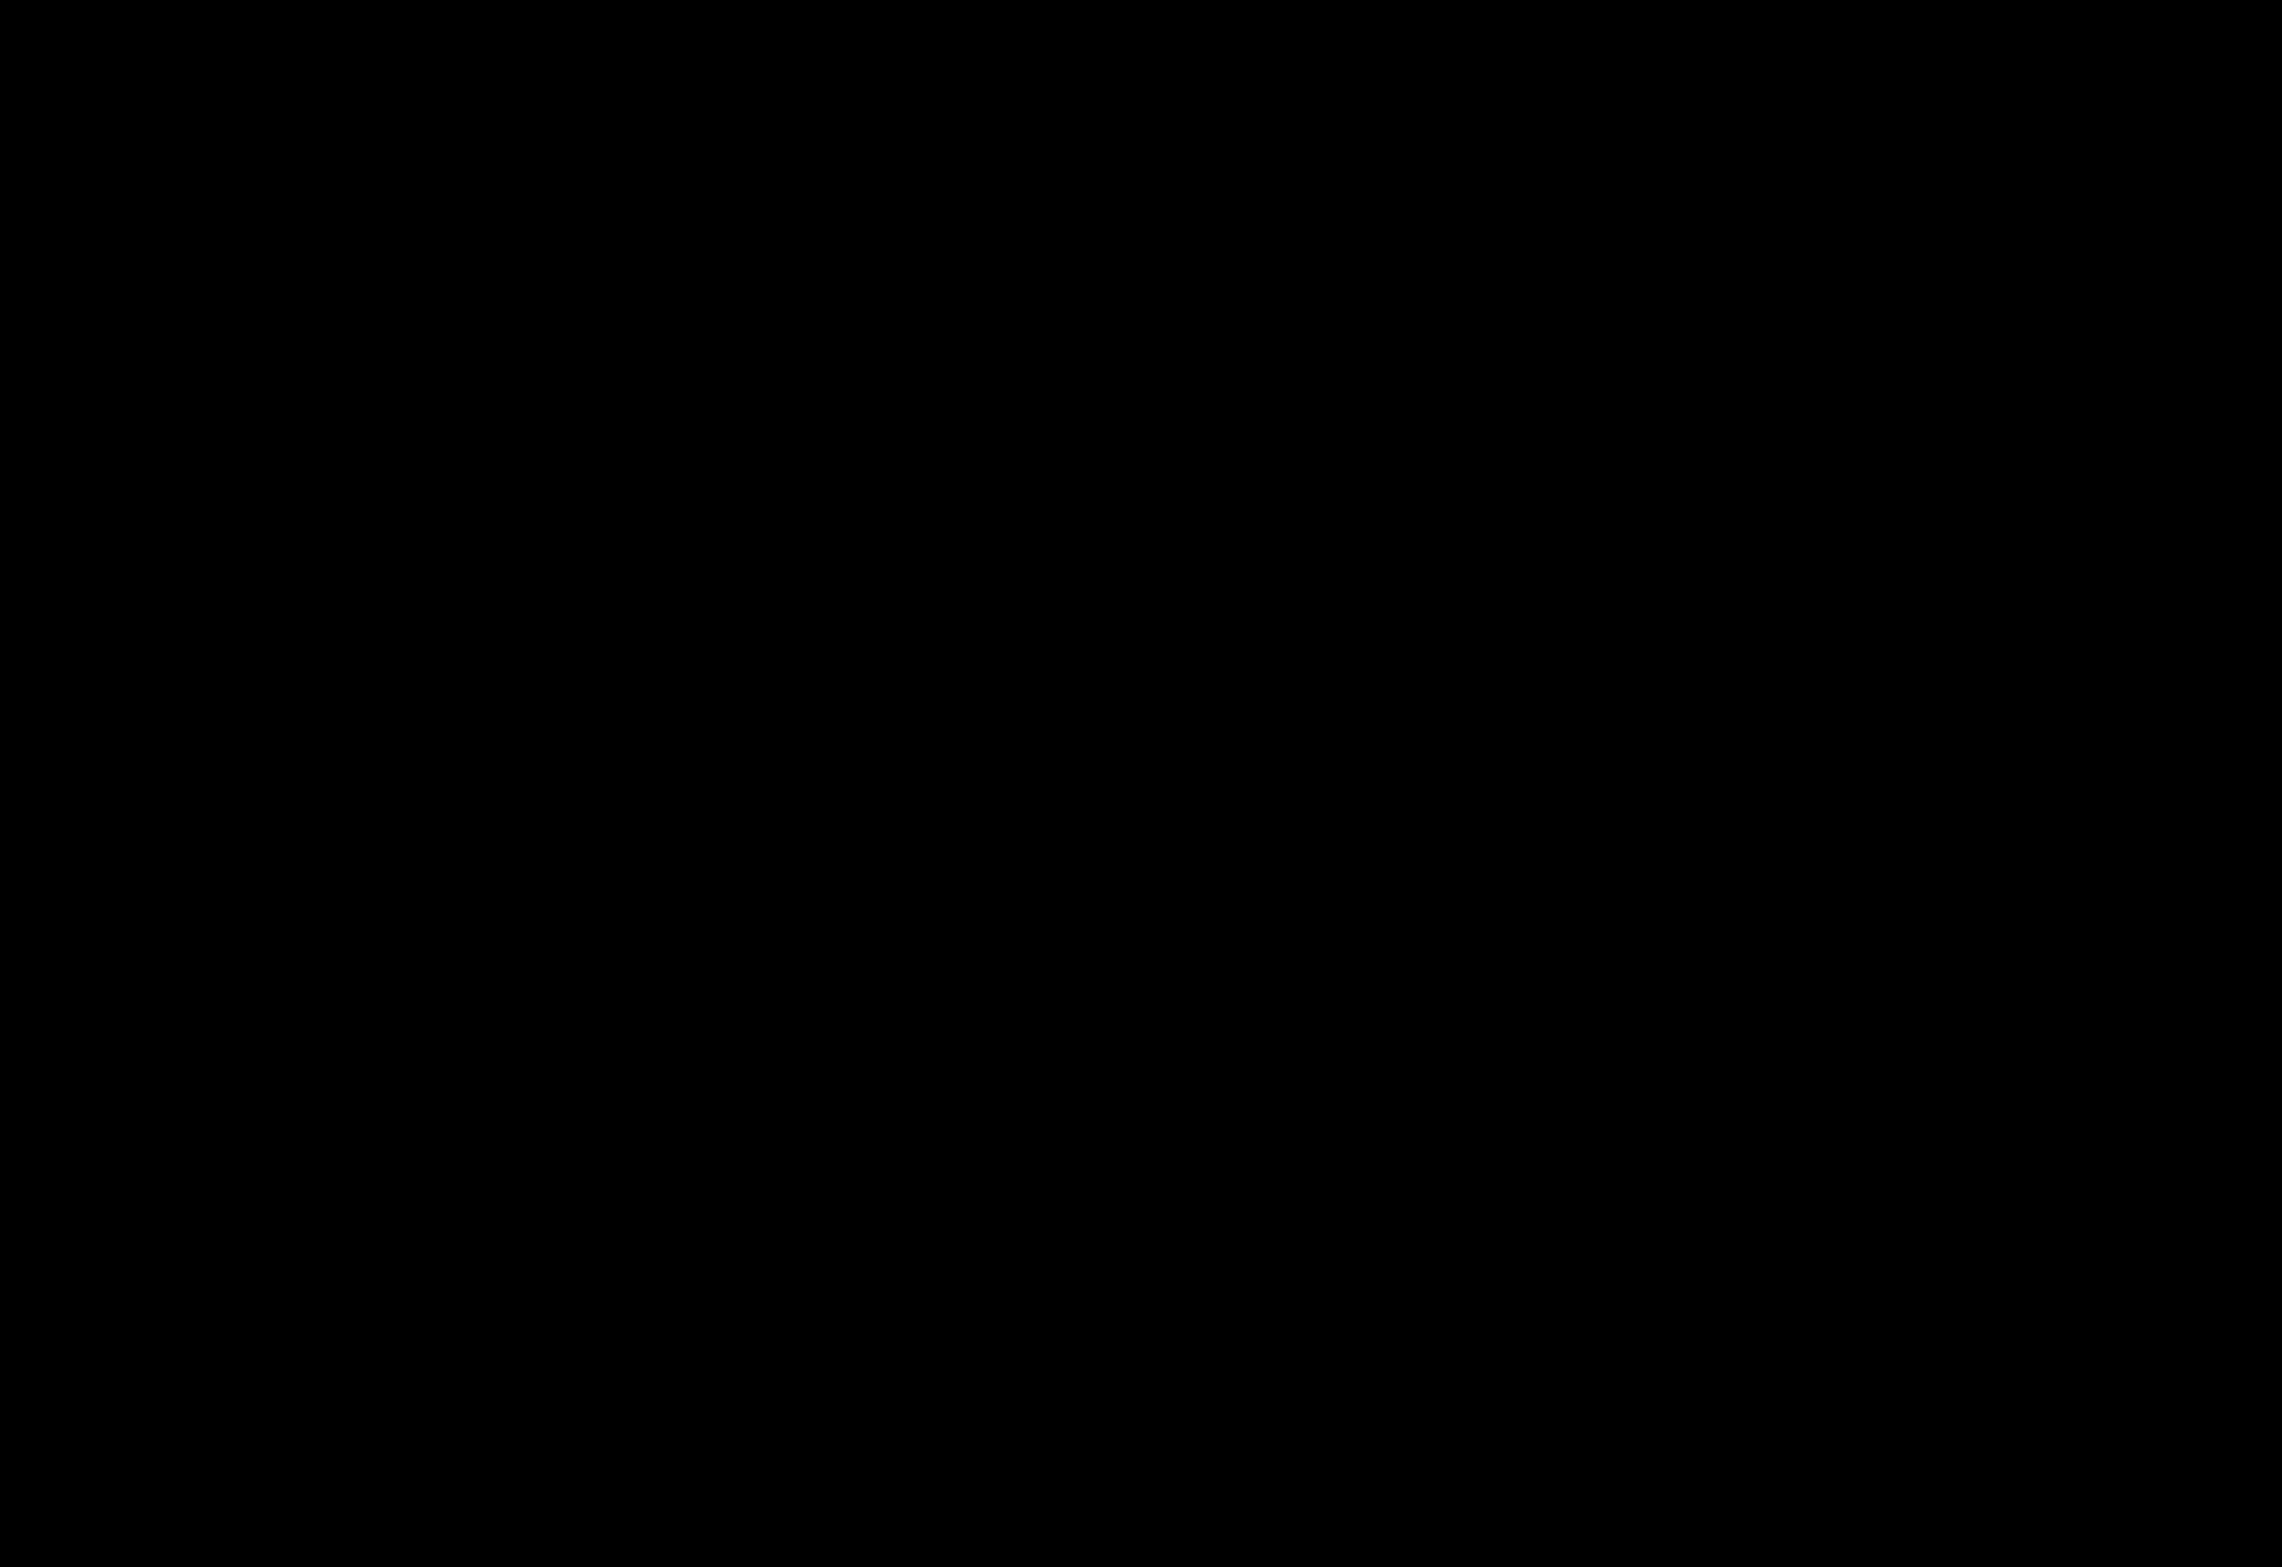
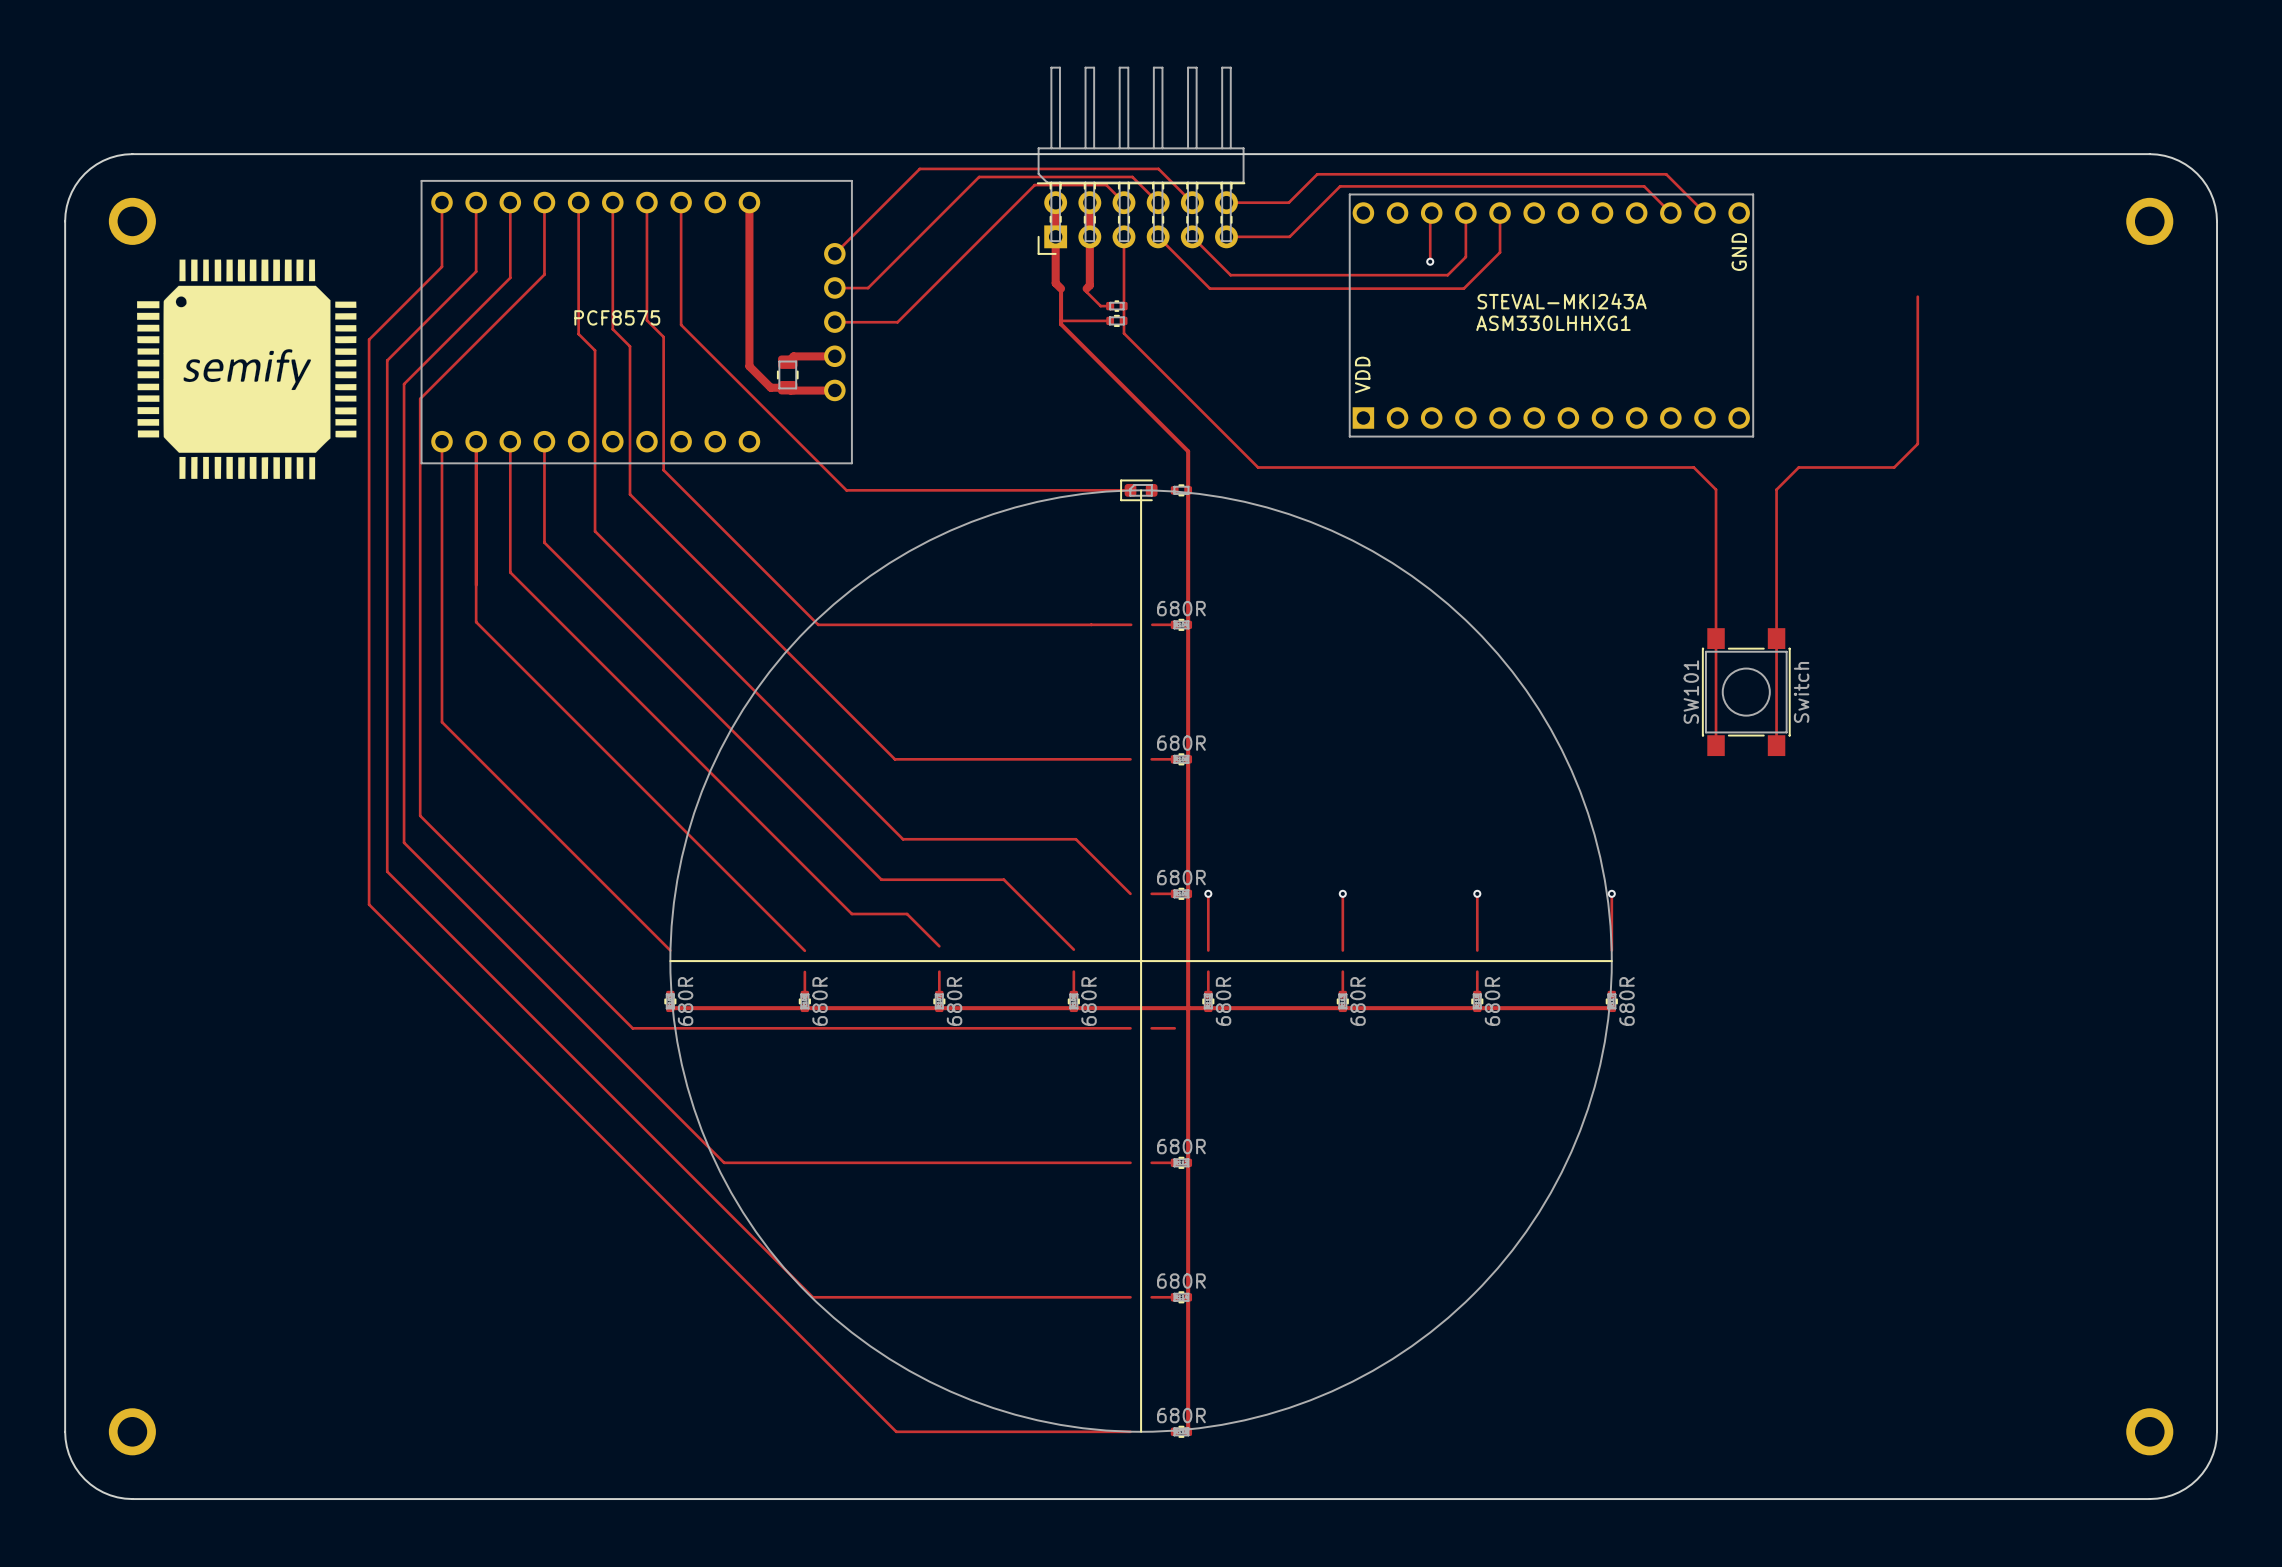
board edge: none -> (132, 154) (2149, 154) (2164, 155) (2185, 164) (2197, 173) (2210, 192) (2215, 206) (2217, 221) (2217, 1431) (2213, 1454) (2206, 1467) (2197, 1479) (2178, 1492) (2164, 1497) (2149, 1499) (132, 1499) (117, 1497) (96, 1488) (84, 1479) (75, 1467) (68, 1454) (65, 1431) (65, 221) (68, 199) (75, 185) (84, 173) (96, 164) (110, 157) (132, 154)
part: none -> (1141, 160)
track: none -> (441, 202) (441, 266) (369, 339) (369, 904) (896, 1431) (1130, 1431)
track: none -> (476, 202) (476, 271) (387, 360) (387, 871) (812, 1297) (1130, 1297)
track: none -> (510, 202) (510, 277) (404, 384) (404, 842) (724, 1162) (1130, 1162)
track: none -> (544, 202) (544, 274) (420, 398) (420, 815) (632, 1028) (1130, 1028)
track: none -> (578, 202) (578, 334) (595, 350) (595, 531) (903, 839) (1075, 839) (1130, 893)
track: none -> (612, 202) (612, 329) (630, 346) (630, 494) (894, 759) (1130, 759)
track: none -> (646, 202) (646, 320) (663, 337) (663, 470) (818, 624) (1131, 624)
track: none -> (681, 202) (681, 324) (846, 490) (1130, 490)
track: none -> (749, 202) (749, 366) (770, 387) (787, 387) (790, 390) (834, 390)
track: none -> (1055, 202) (1055, 283) (1061, 288) (1061, 324) (1188, 451) (1188, 1431)
track: none -> (1089, 202) (1089, 285) (1086, 291) (1100, 306) (1110, 306)
track: none -> (1124, 202) (1106, 185) (1034, 185) (897, 322) (834, 322)
track: none -> (1158, 202) (1132, 176) (979, 176) (868, 288) (834, 288)
track: none -> (1192, 202) (1158, 168) (919, 168) (834, 253)
track: none -> (1226, 202) (1288, 202) (1317, 174) (1666, 174) (1705, 213)
track: none -> (1465, 213) (1465, 257) (1447, 275) (1230, 275) (1192, 236)
track: none -> (1500, 213) (1500, 252) (1463, 288) (1209, 288) (1158, 236)
track: none -> (1670, 213) (1644, 186) (1340, 186) (1289, 236) (1226, 236)
track: none -> (1430, 214) (1430, 261)
part: none -> (132, 221)
part: none -> (2149, 221)
track: none -> (1124, 236) (1124, 333) (1258, 467) (1693, 467) (1716, 489) (1716, 745)
text: none -> GND (1739, 252)
drawing: none -> [137, 259, 357, 480]
via: none -> (1430, 261)
track: none -> (1917, 296) (1917, 443) (1894, 467) (1798, 467) (1776, 489) (1776, 745)
text: none -> STEVAL-MKI243A (1562, 301)
part: none -> (1116, 306)
part: none -> (1551, 315)
text: none -> PCF8575 (617, 317)
track: none -> (1061, 320) (1110, 320)
part: none -> (1116, 320)
part: none -> (636, 322)
text: none -> ASM330LHHXG1 (1553, 323)
track: none -> (834, 356) (793, 356) (787, 362)
part: none -> (787, 374)
text: none -> VDD (1362, 374)
track: none -> (441, 441) (441, 722) (670, 950)
track: none -> (476, 441) (476, 622) (804, 950)
track: none -> (510, 441) (510, 572) (851, 914) (907, 914) (939, 946)
track: none -> (544, 441) (544, 542) (881, 879) (1003, 879) (1073, 949)
drawing: none -> [669, 489, 1613, 1433]
part: none -> (1138, 490)
line: none -> (1141, 490) (1141, 1431)
part: none -> (1181, 490)
track: none -> (1152, 624) (1174, 624)
part: none -> 680R (1181, 624)
SW101: none -> Switch (1746, 692)
track: none -> (1151, 759) (1174, 759)
part: none -> 680R (1181, 759)
track: none -> (1151, 893) (1174, 893)
part: none -> 680R (1181, 893)
track: none -> (1208, 893) (1208, 950)
via: none -> (1208, 893)
track: none -> (1342, 893) (1342, 950)
via: none -> (1342, 893)
track: none -> (1477, 893) (1477, 950)
via: none -> (1477, 893)
track: none -> (1611, 893) (1611, 950)
via: none -> (1611, 893)
line: none -> (670, 961) (1611, 961)
track: none -> (804, 971) (804, 994)
track: none -> (939, 971) (939, 994)
track: none -> (1073, 971) (1073, 994)
track: none -> (1208, 971) (1208, 994)
track: none -> (1342, 971) (1342, 994)
track: none -> (1477, 971) (1477, 994)
part: none -> 680R (670, 1001)
part: none -> 680R (804, 1001)
part: none -> 680R (939, 1001)
part: none -> 680R (1073, 1001)
part: none -> 680R (1208, 1001)
part: none -> 680R (1342, 1001)
part: none -> 680R (1477, 1001)
part: none -> 680R (1611, 1001)
track: none -> (670, 1008) (1611, 1008)
track: none -> (1151, 1028) (1174, 1028)
track: none -> (1151, 1162) (1174, 1162)
part: none -> 680R (1181, 1162)
track: none -> (1151, 1297) (1174, 1297)
part: none -> 680R (1181, 1297)
part: none -> (132, 1431)
part: none -> 680R (1181, 1431)
part: none -> (2149, 1431)

